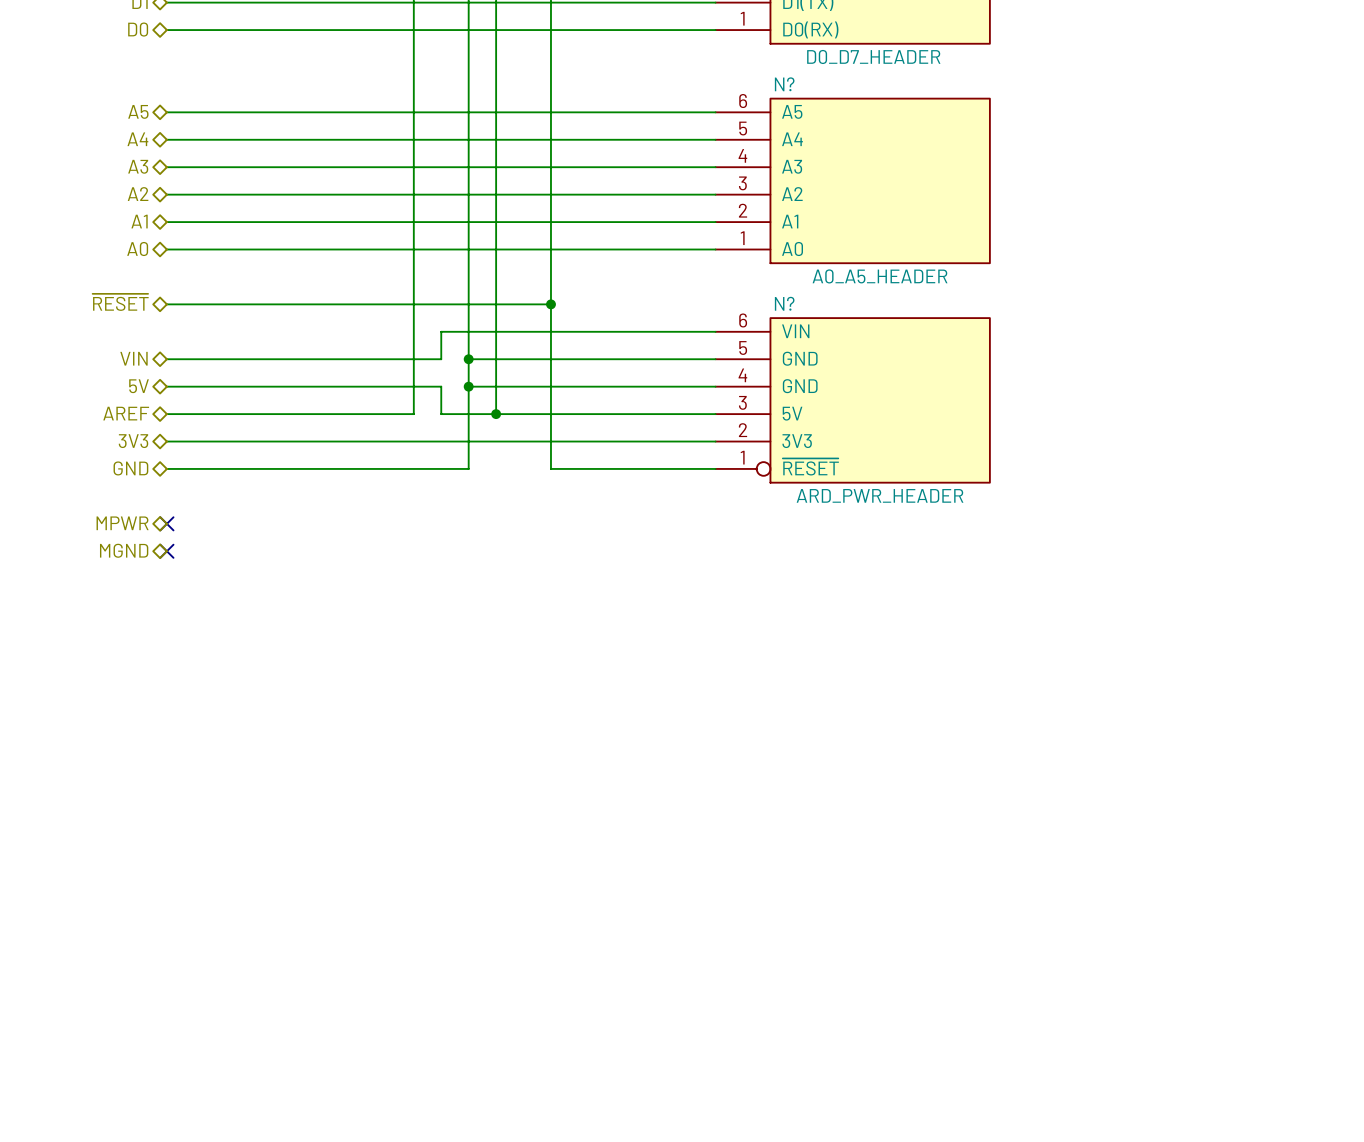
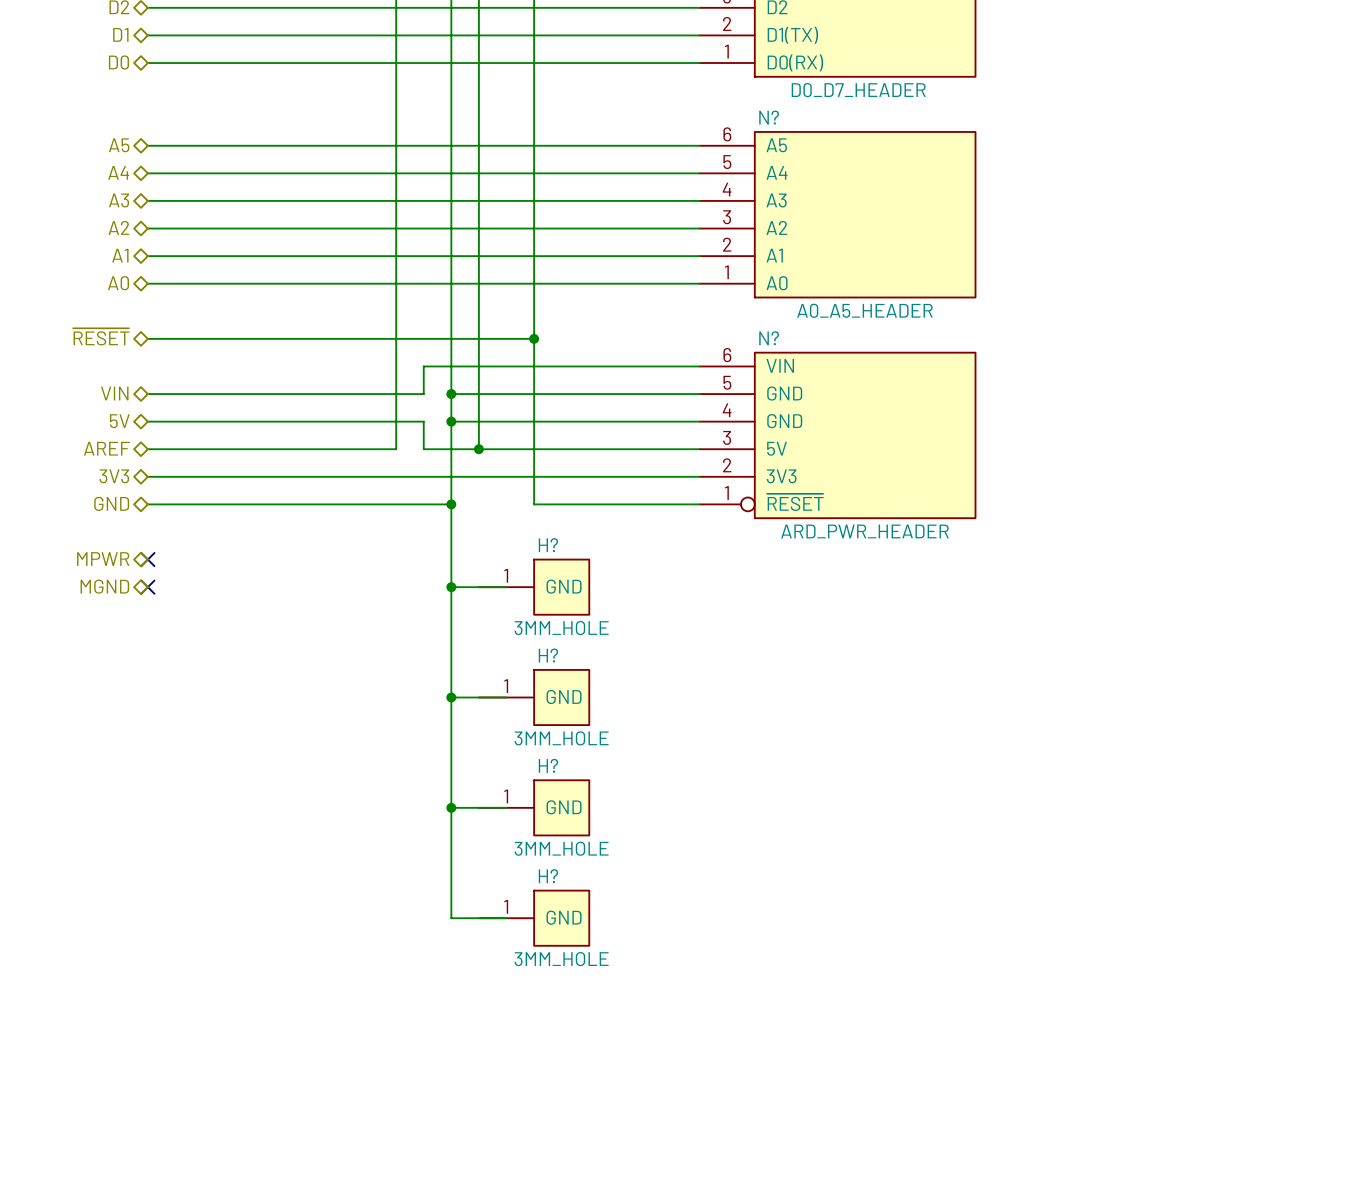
wire: none -> (451, 504) (451, 918) (506, 918)
junction: none -> (451, 504)
wire: none -> (451, 587) (506, 587)
junction: none -> (451, 587)
H?: none -> 3MM_HOLE (534, 587)
wire: none -> (451, 697) (506, 697)
junction: none -> (451, 697)
H?: none -> 3MM_HOLE (534, 697)
wire: none -> (451, 807) (506, 807)
junction: none -> (451, 807)
H?: none -> 3MM_HOLE (534, 807)
H?: none -> 3MM_HOLE (534, 918)

